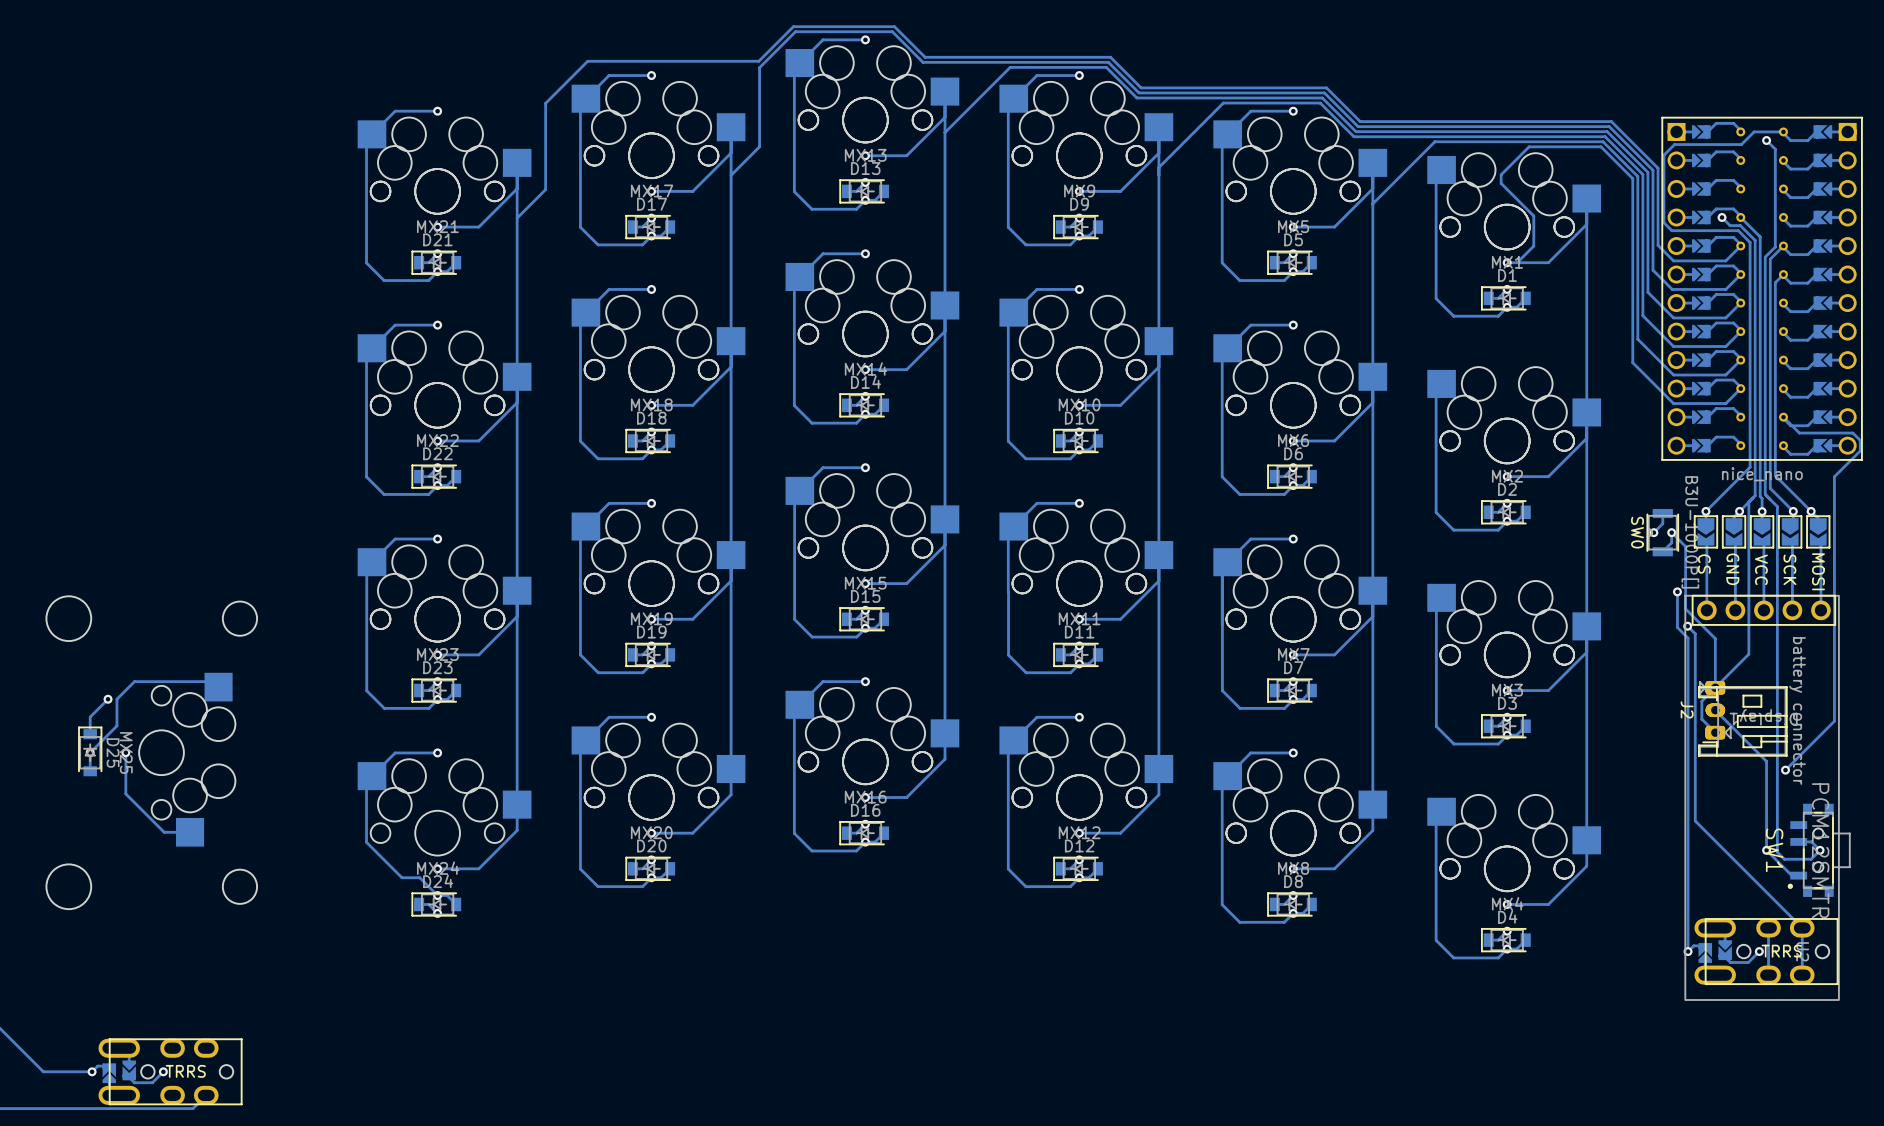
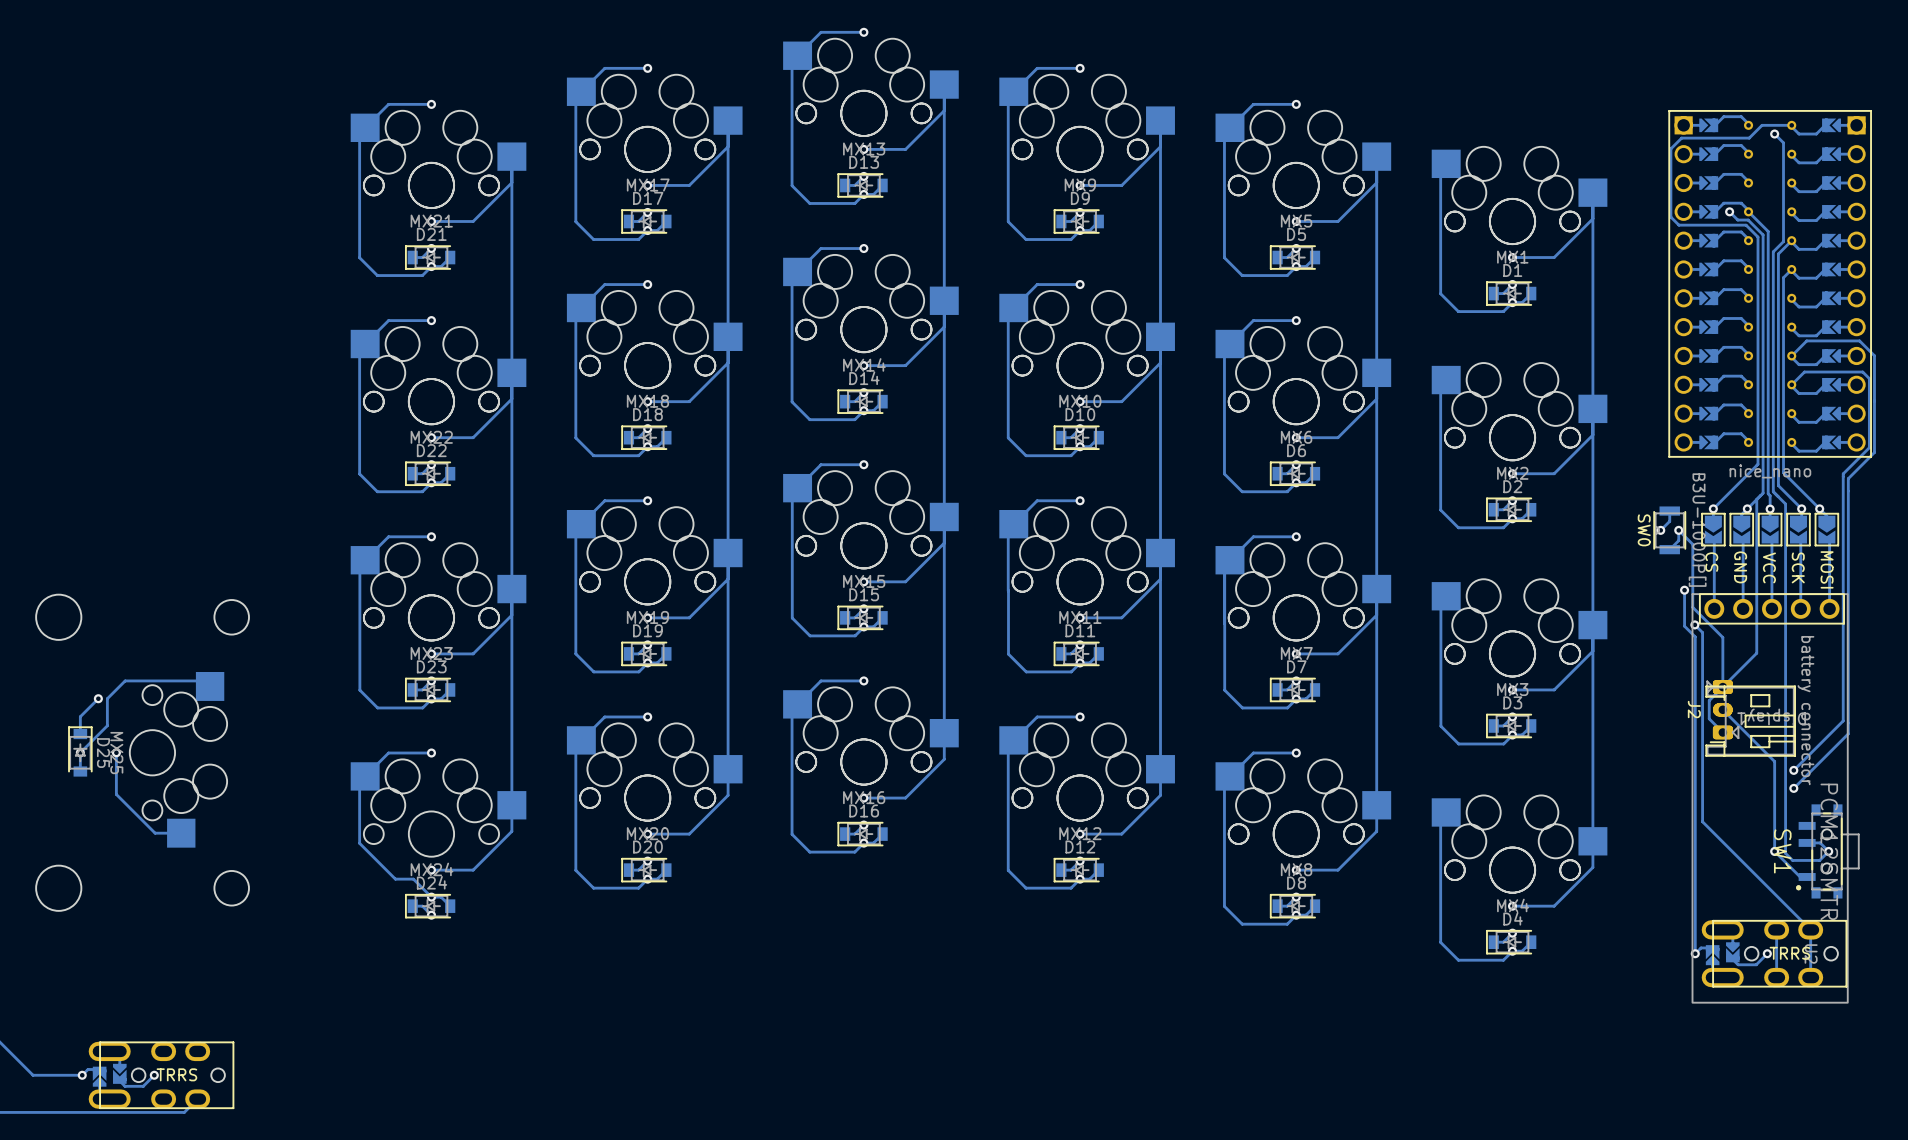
track: (945, 132) (1010, 67) (1106, 67) (1136, 98) (1322, 98) (1356, 131) (1607, 131) (1647, 172) (1647, 292) (1673, 317) (1725, 317) (1740, 303) -> none
track: (1158, 167) (1223, 103) (1320, 103) (1353, 136) (1605, 136) (1642, 174) (1642, 315) (1673, 346) (1725, 346) (1740, 331) -> none
track: (731, 175) (759, 146) (759, 67) (795, 31) (892, 31) (923, 62) (1108, 62) (1139, 92) (1324, 92) (1358, 126) (1609, 126) (1652, 170) (1652, 270) (1672, 289) (1725, 289) (1740, 274) -> none
track: (1372, 203) (1434, 141) (1603, 141) (1637, 176) (1637, 339) (1673, 375) (1725, 375) (1740, 360) -> none
track: (517, 218) (545, 189) (545, 103) (587, 61) (758, 61) (793, 26) (894, 26) (925, 57) (1110, 57) (1141, 87) (1326, 87) (1360, 121) (1611, 121) (1658, 168) (1658, 245) (1673, 260) (1725, 260) (1740, 246) -> none
track: (1517, 262) (1533, 246) (1533, 216) (1501, 183) (1501, 174) (1529, 146) (1600, 146) (1632, 178) (1632, 362) (1673, 403) (1725, 403) (1740, 388) -> none
track: none -> (1791, 355) (1806, 340) (1859, 340) (1874, 355) (1874, 452) (1848, 478) (1848, 733) (1793, 788)
track: (1783, 417) (1799, 433) (1852, 433) (1860, 440) -> (1791, 384) (1804, 372) (1862, 372) (1869, 378) (1869, 437)
via: none -> (1793, 788)

